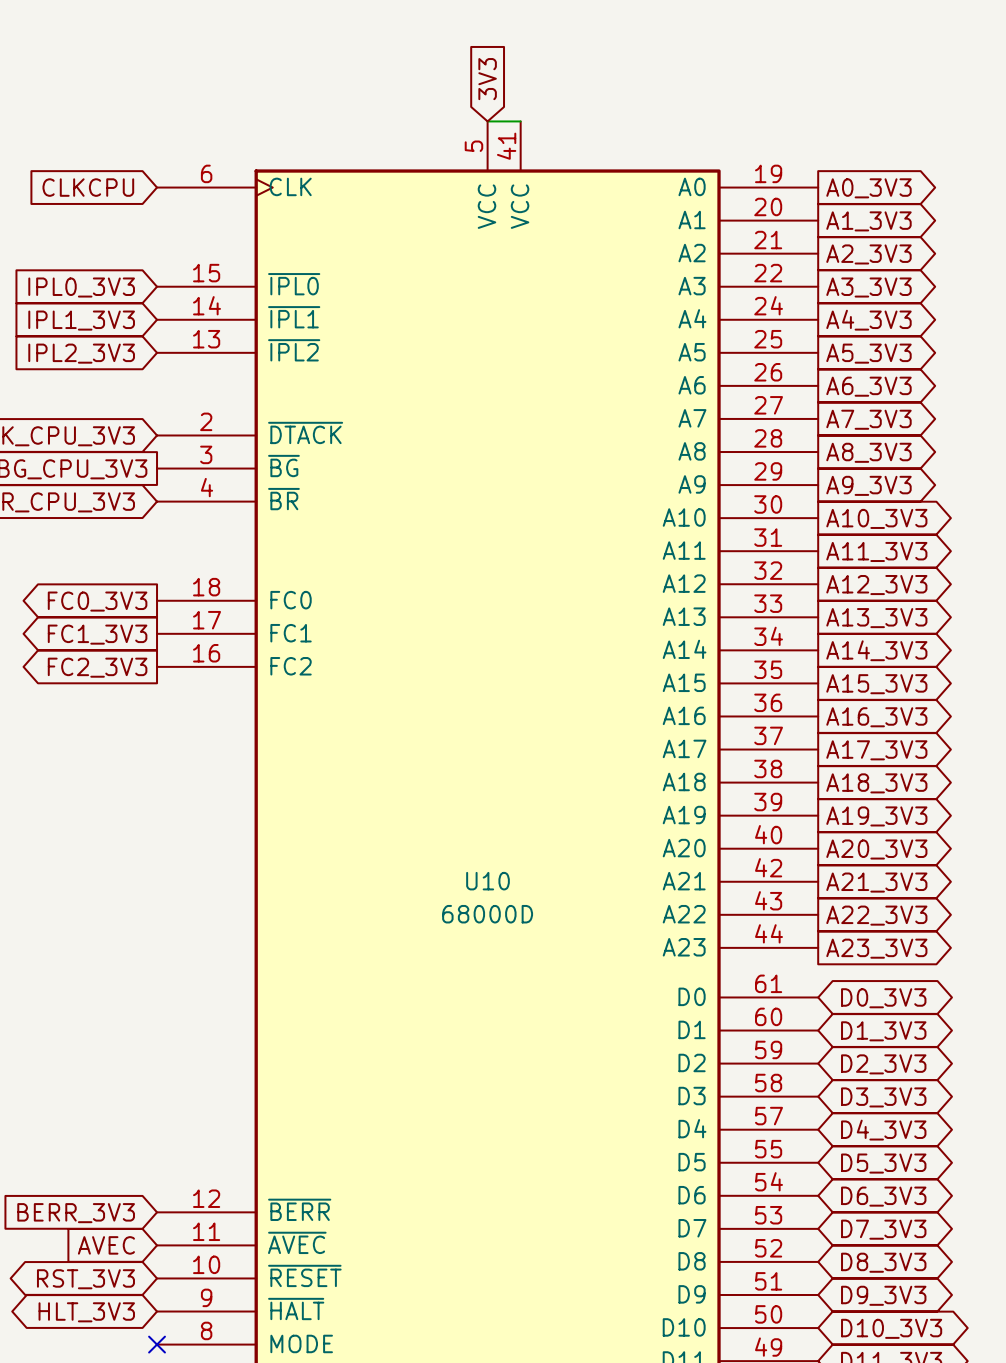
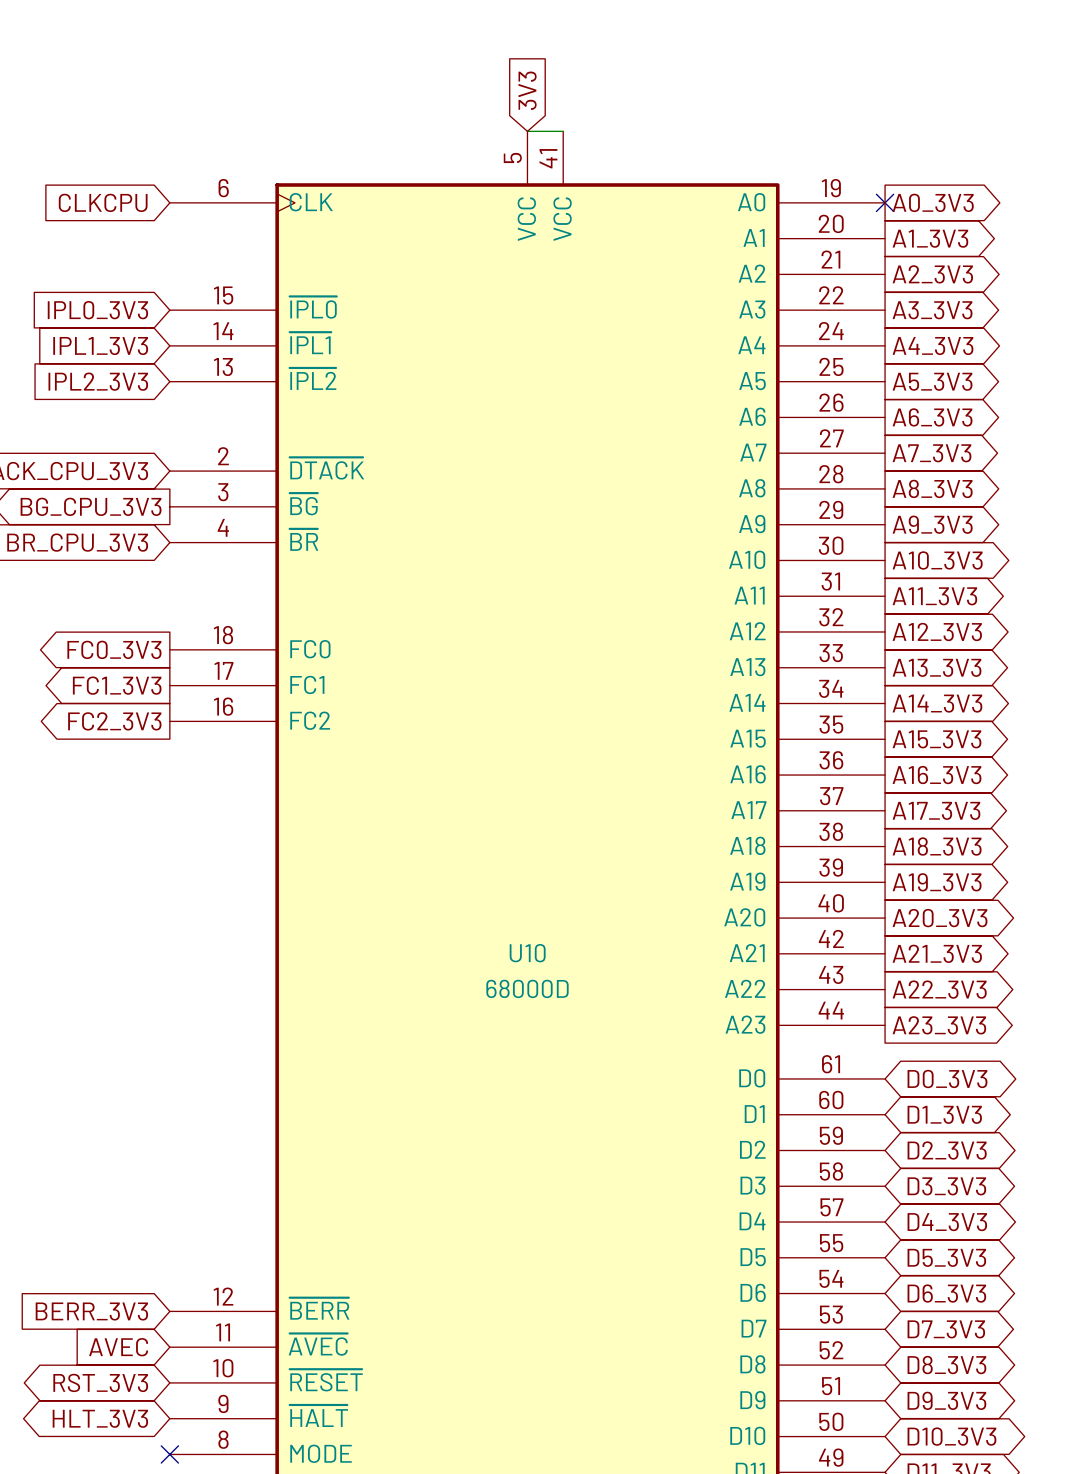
no-connect mark: none -> (885, 202)

